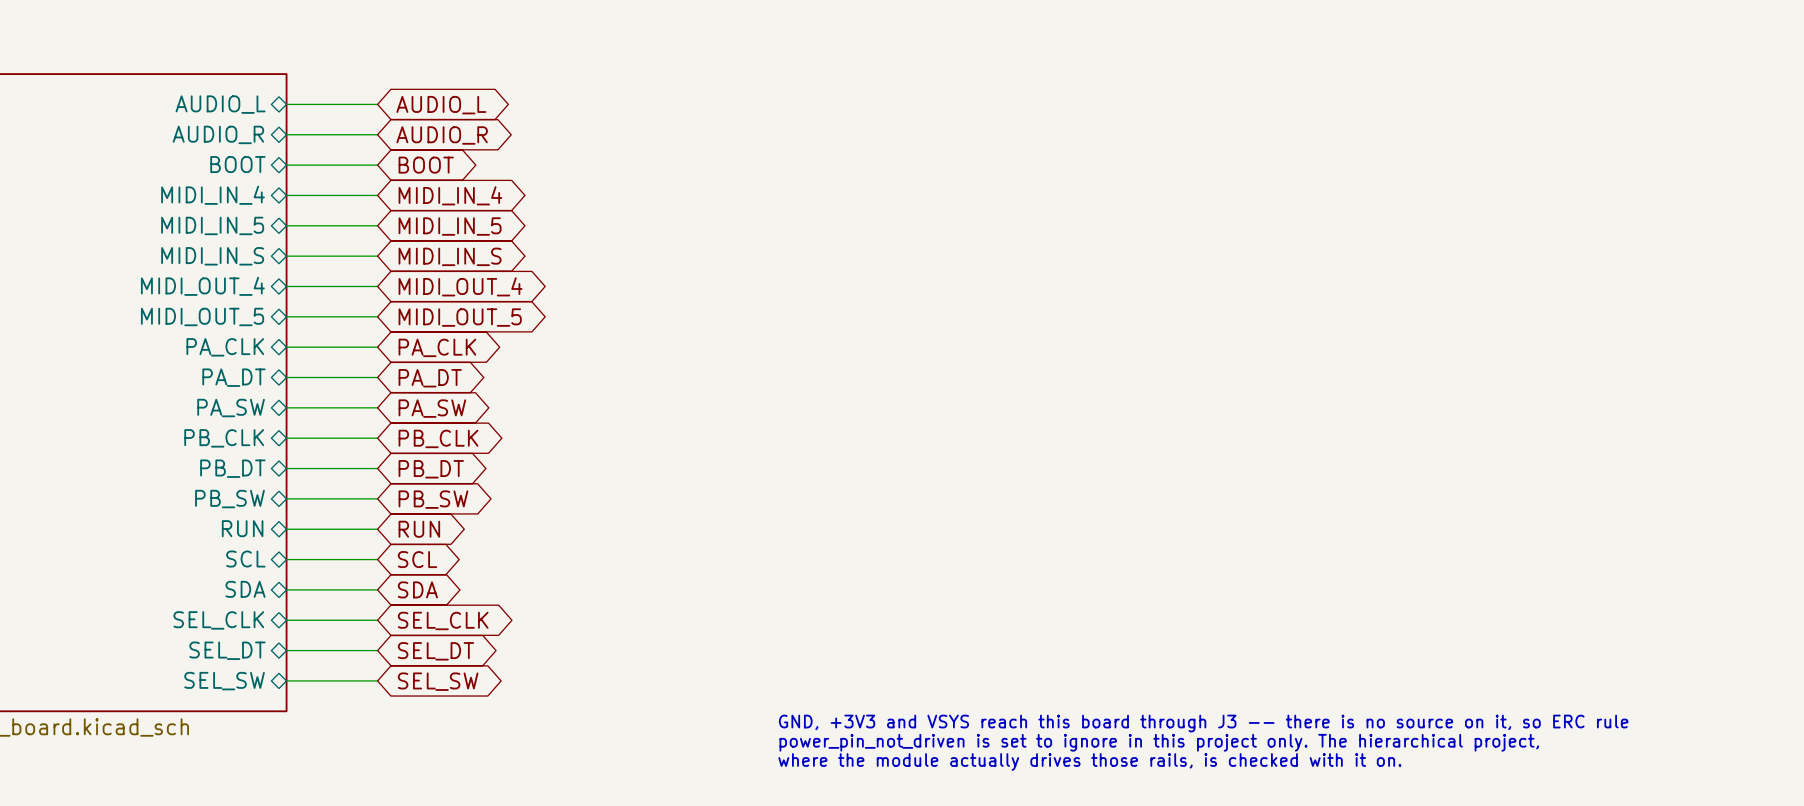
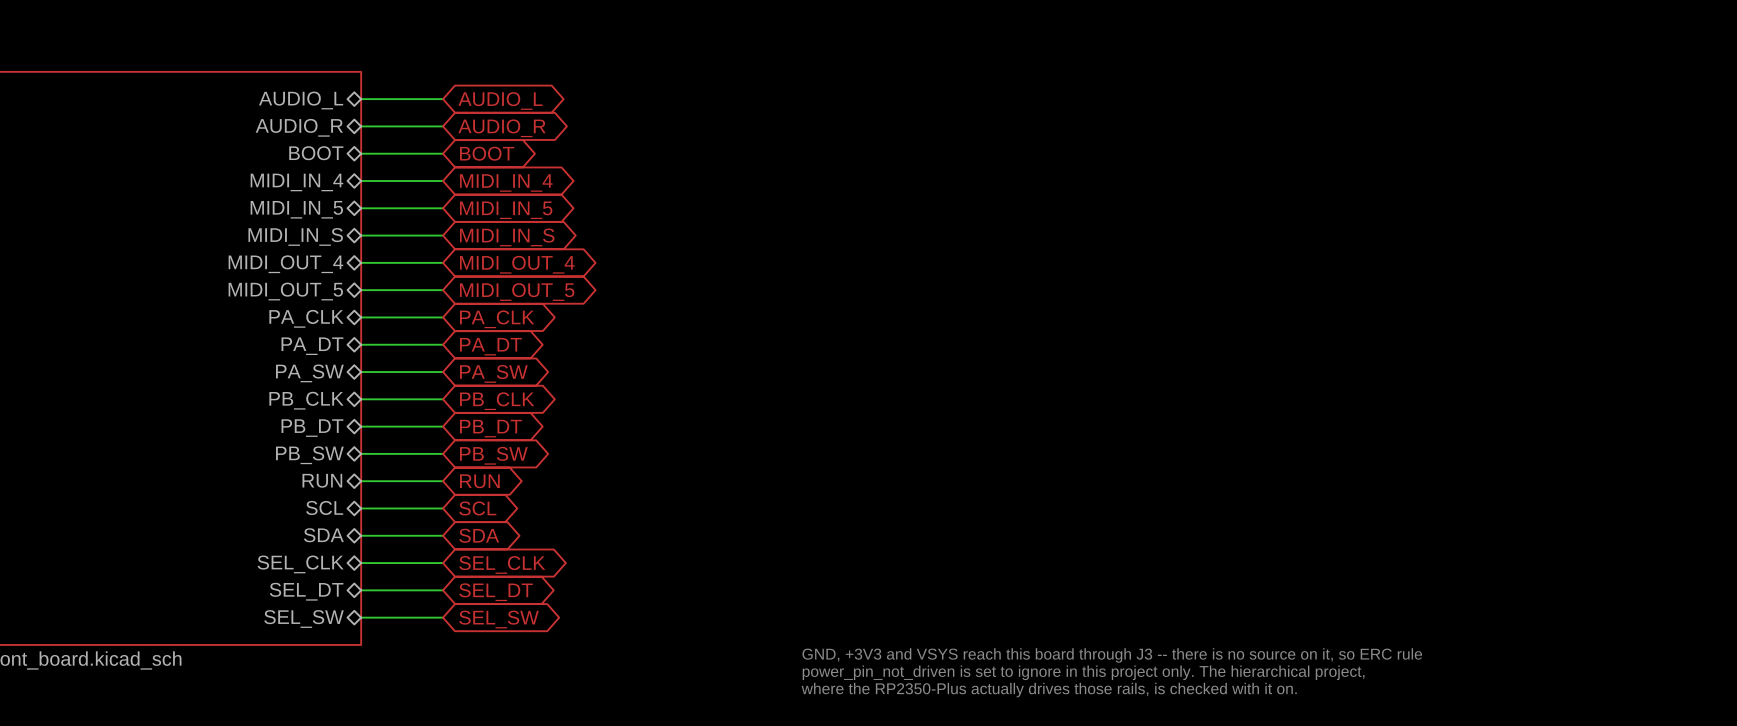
text: where the module actually drives those rails, is checked with it on. (1089, 761) -> where the RP2350-Plus actually drives those rails, is checked with it on. (1049, 690)

